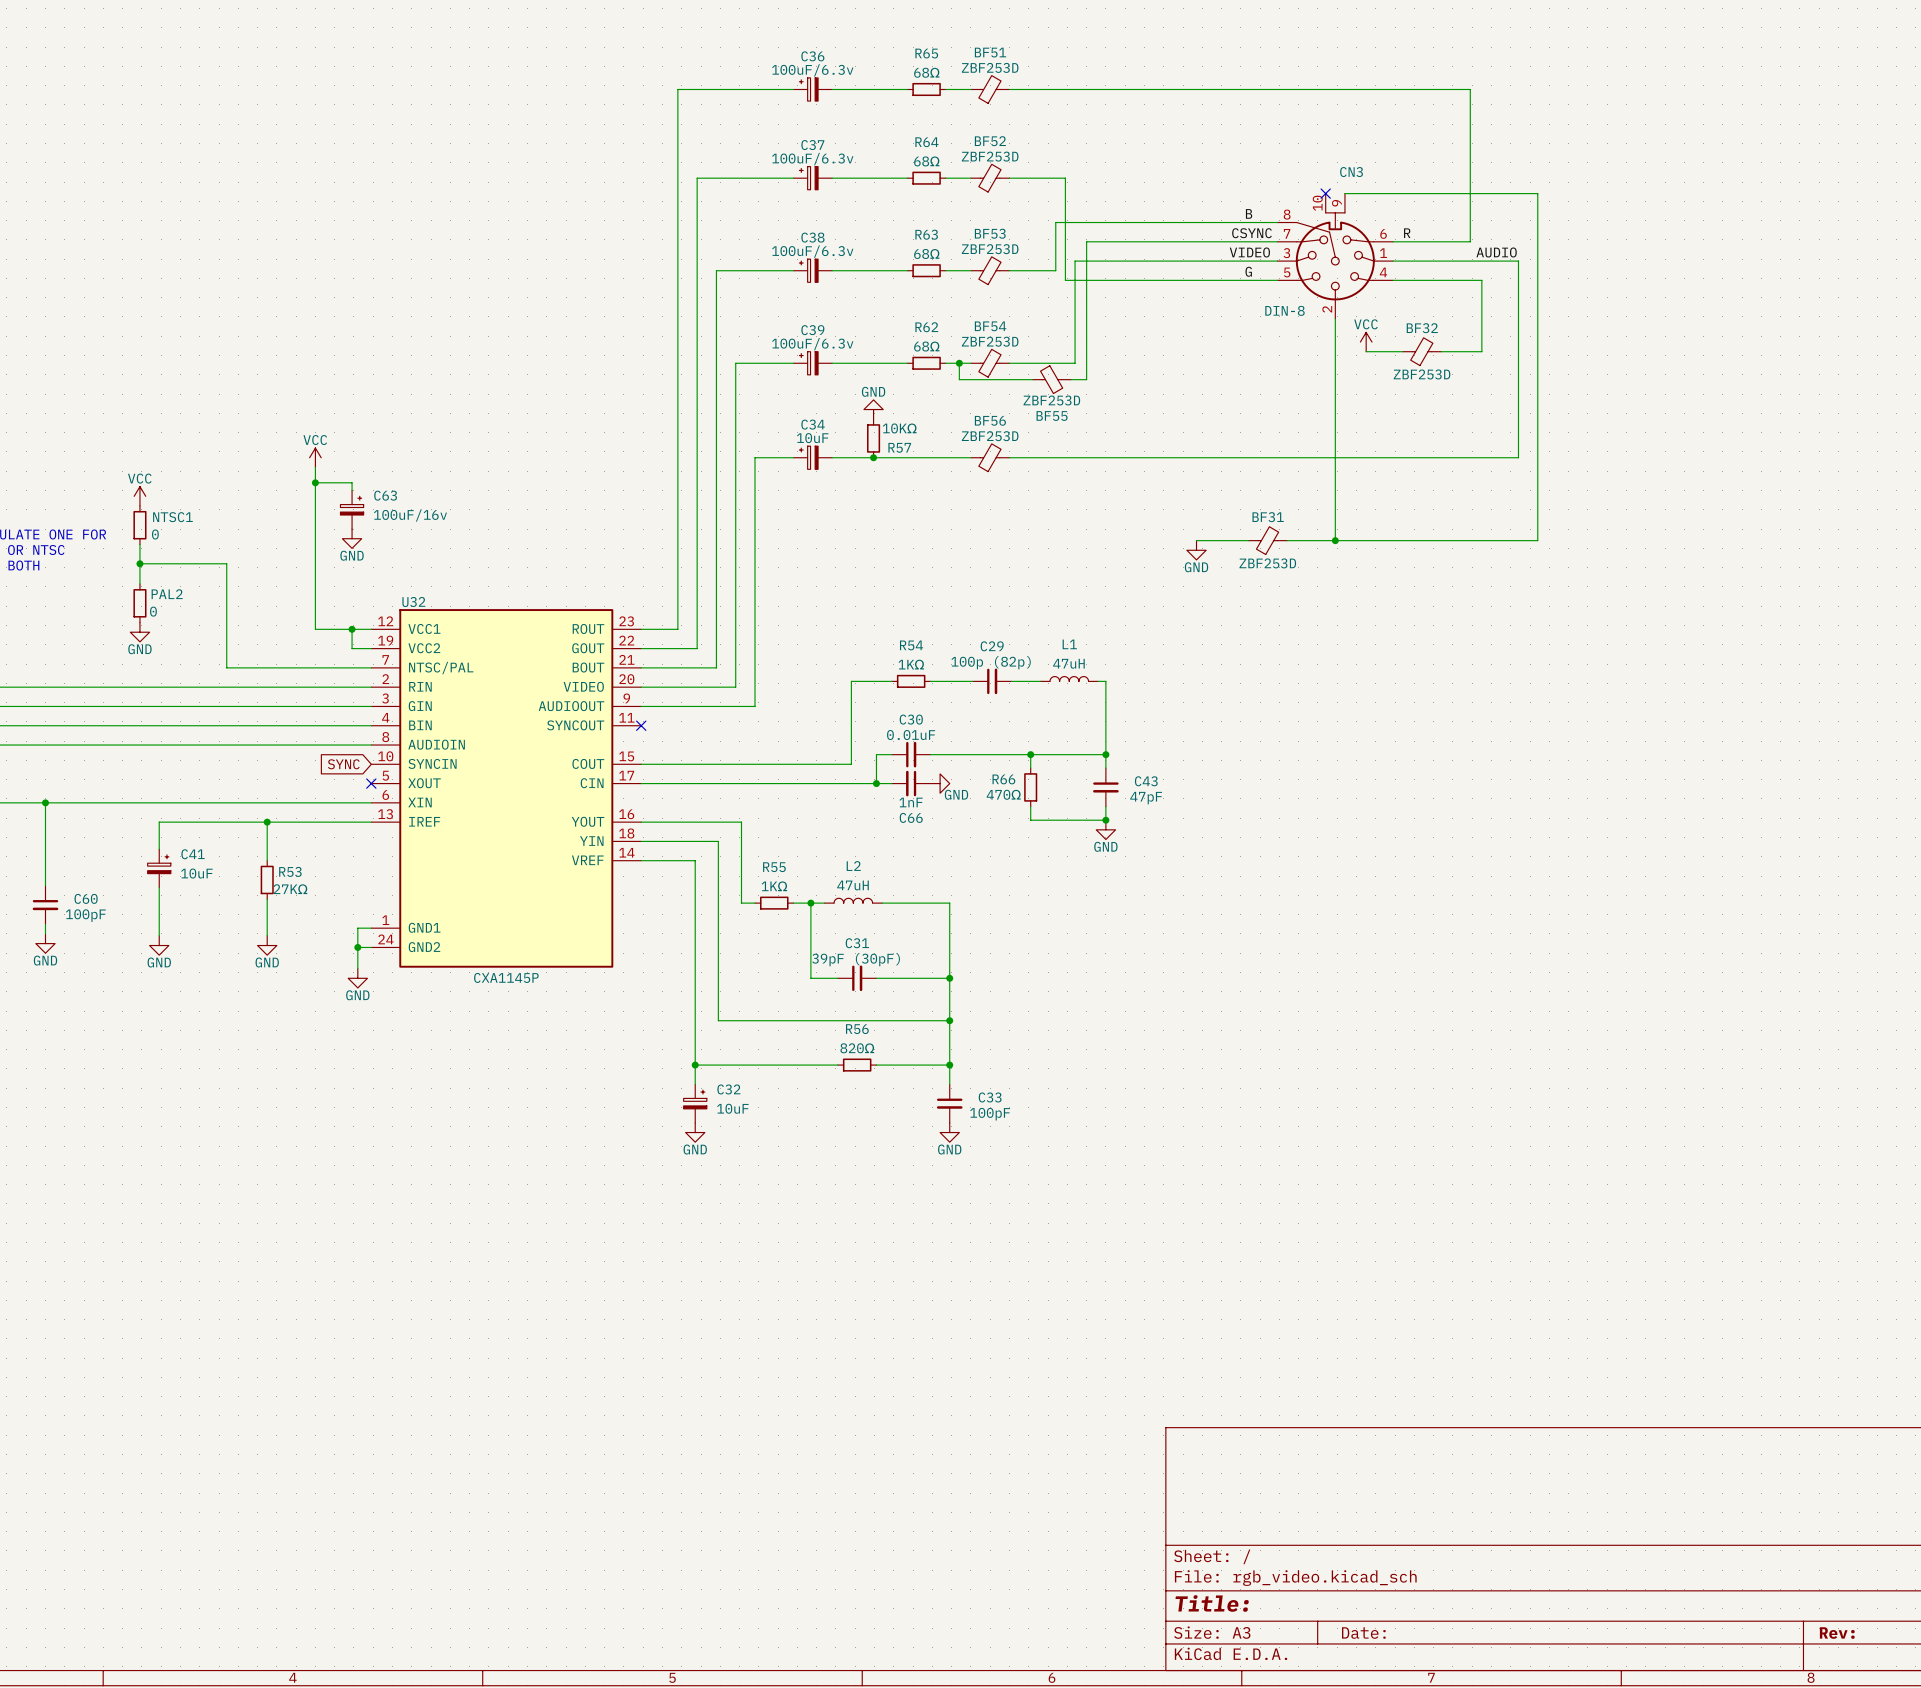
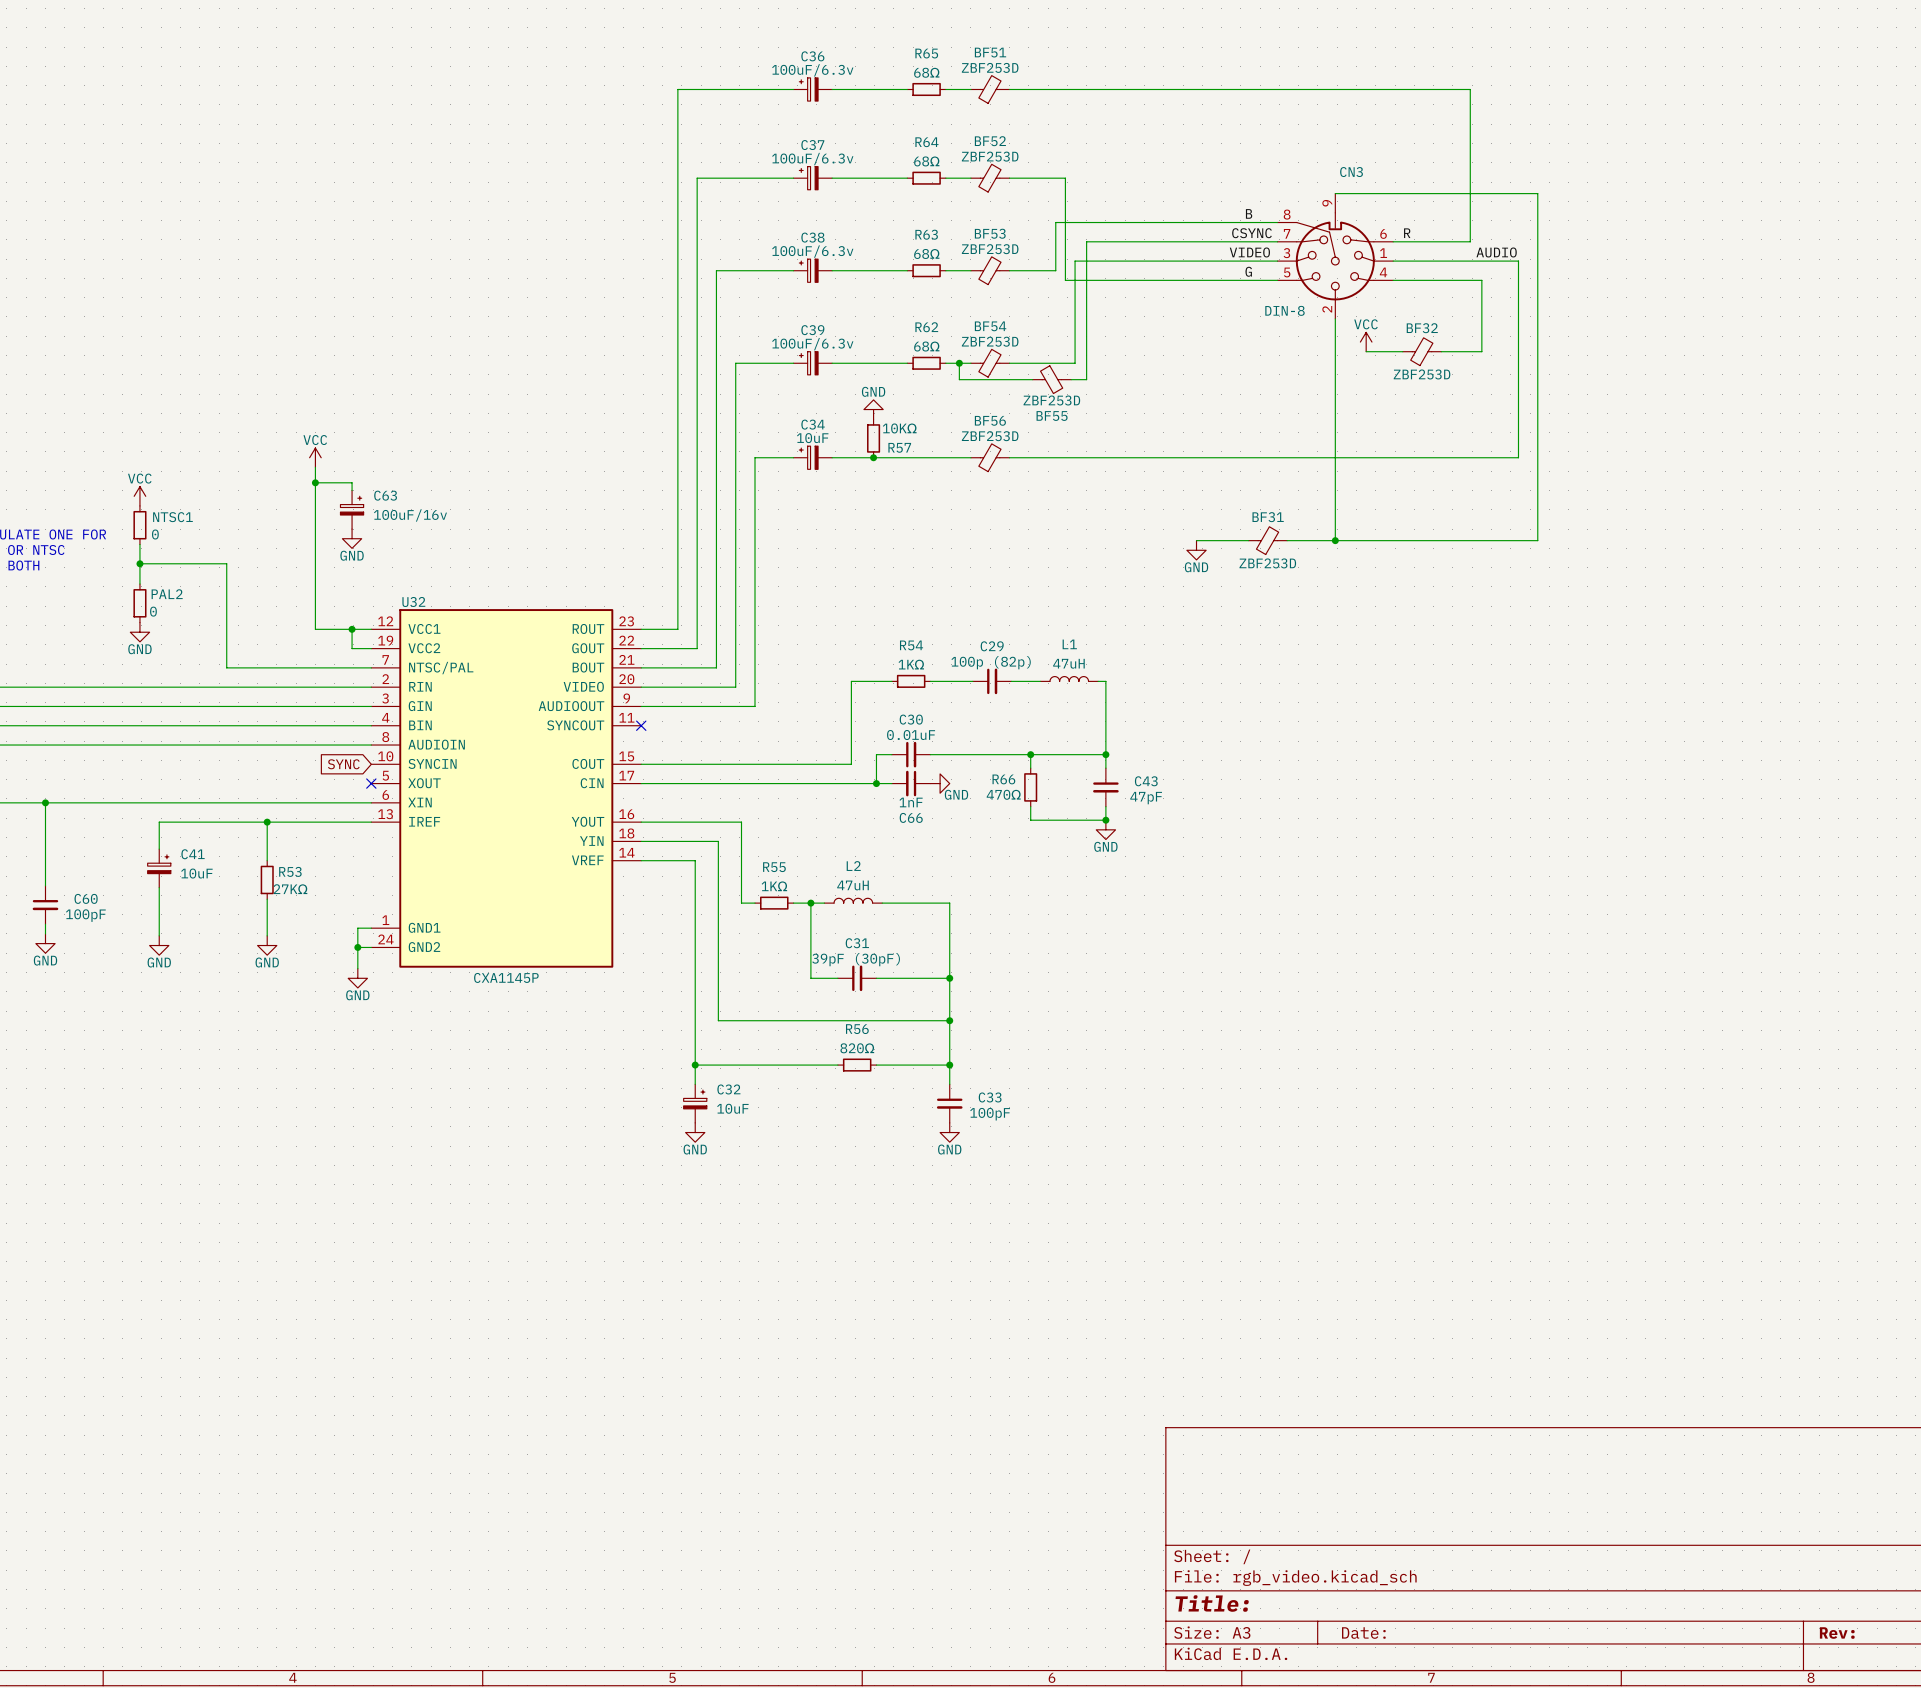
CN3 symbol: [1277, 193, 1394, 319] -> [1277, 193, 1394, 319]
no-connect mark: (1325, 193) -> none
wire: none -> (1335, 193) (1344, 193)

